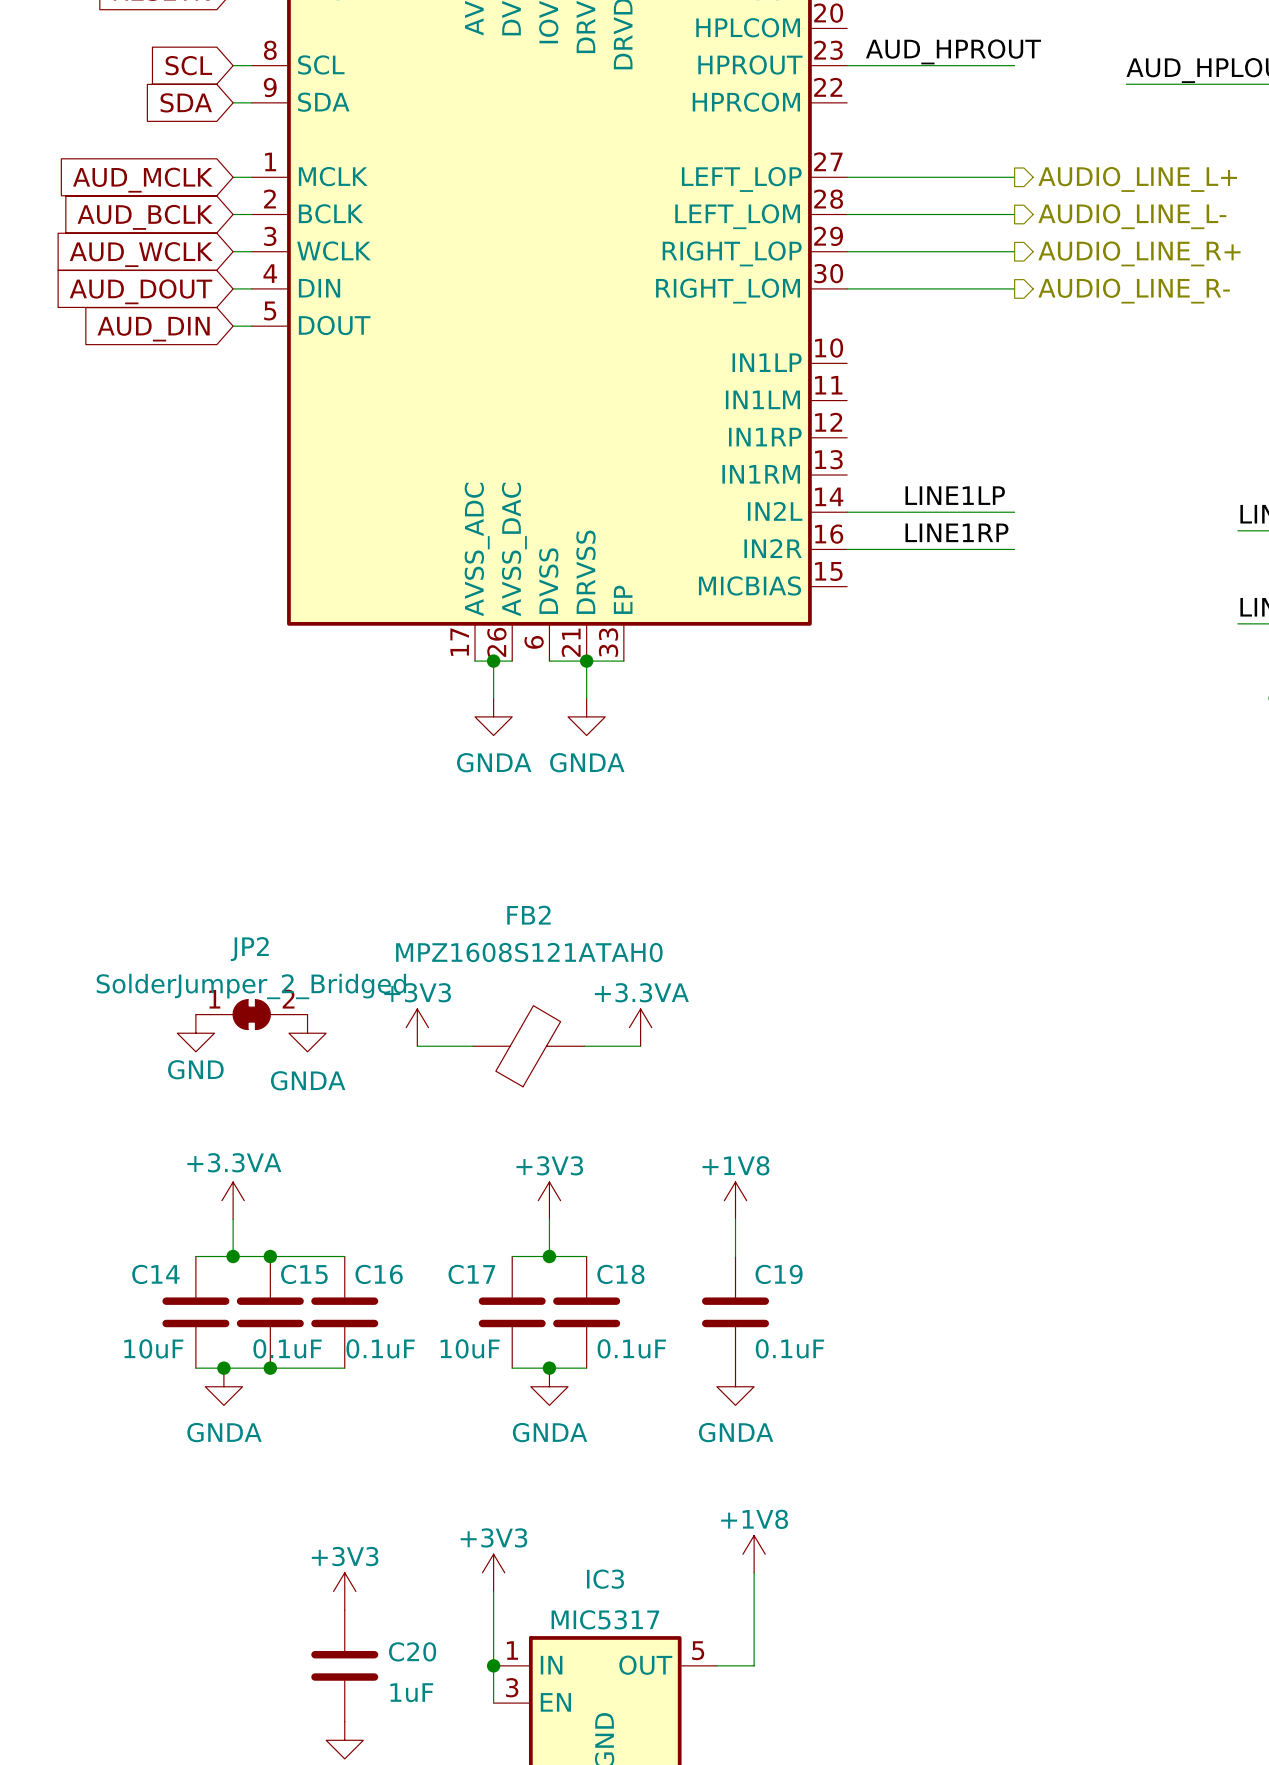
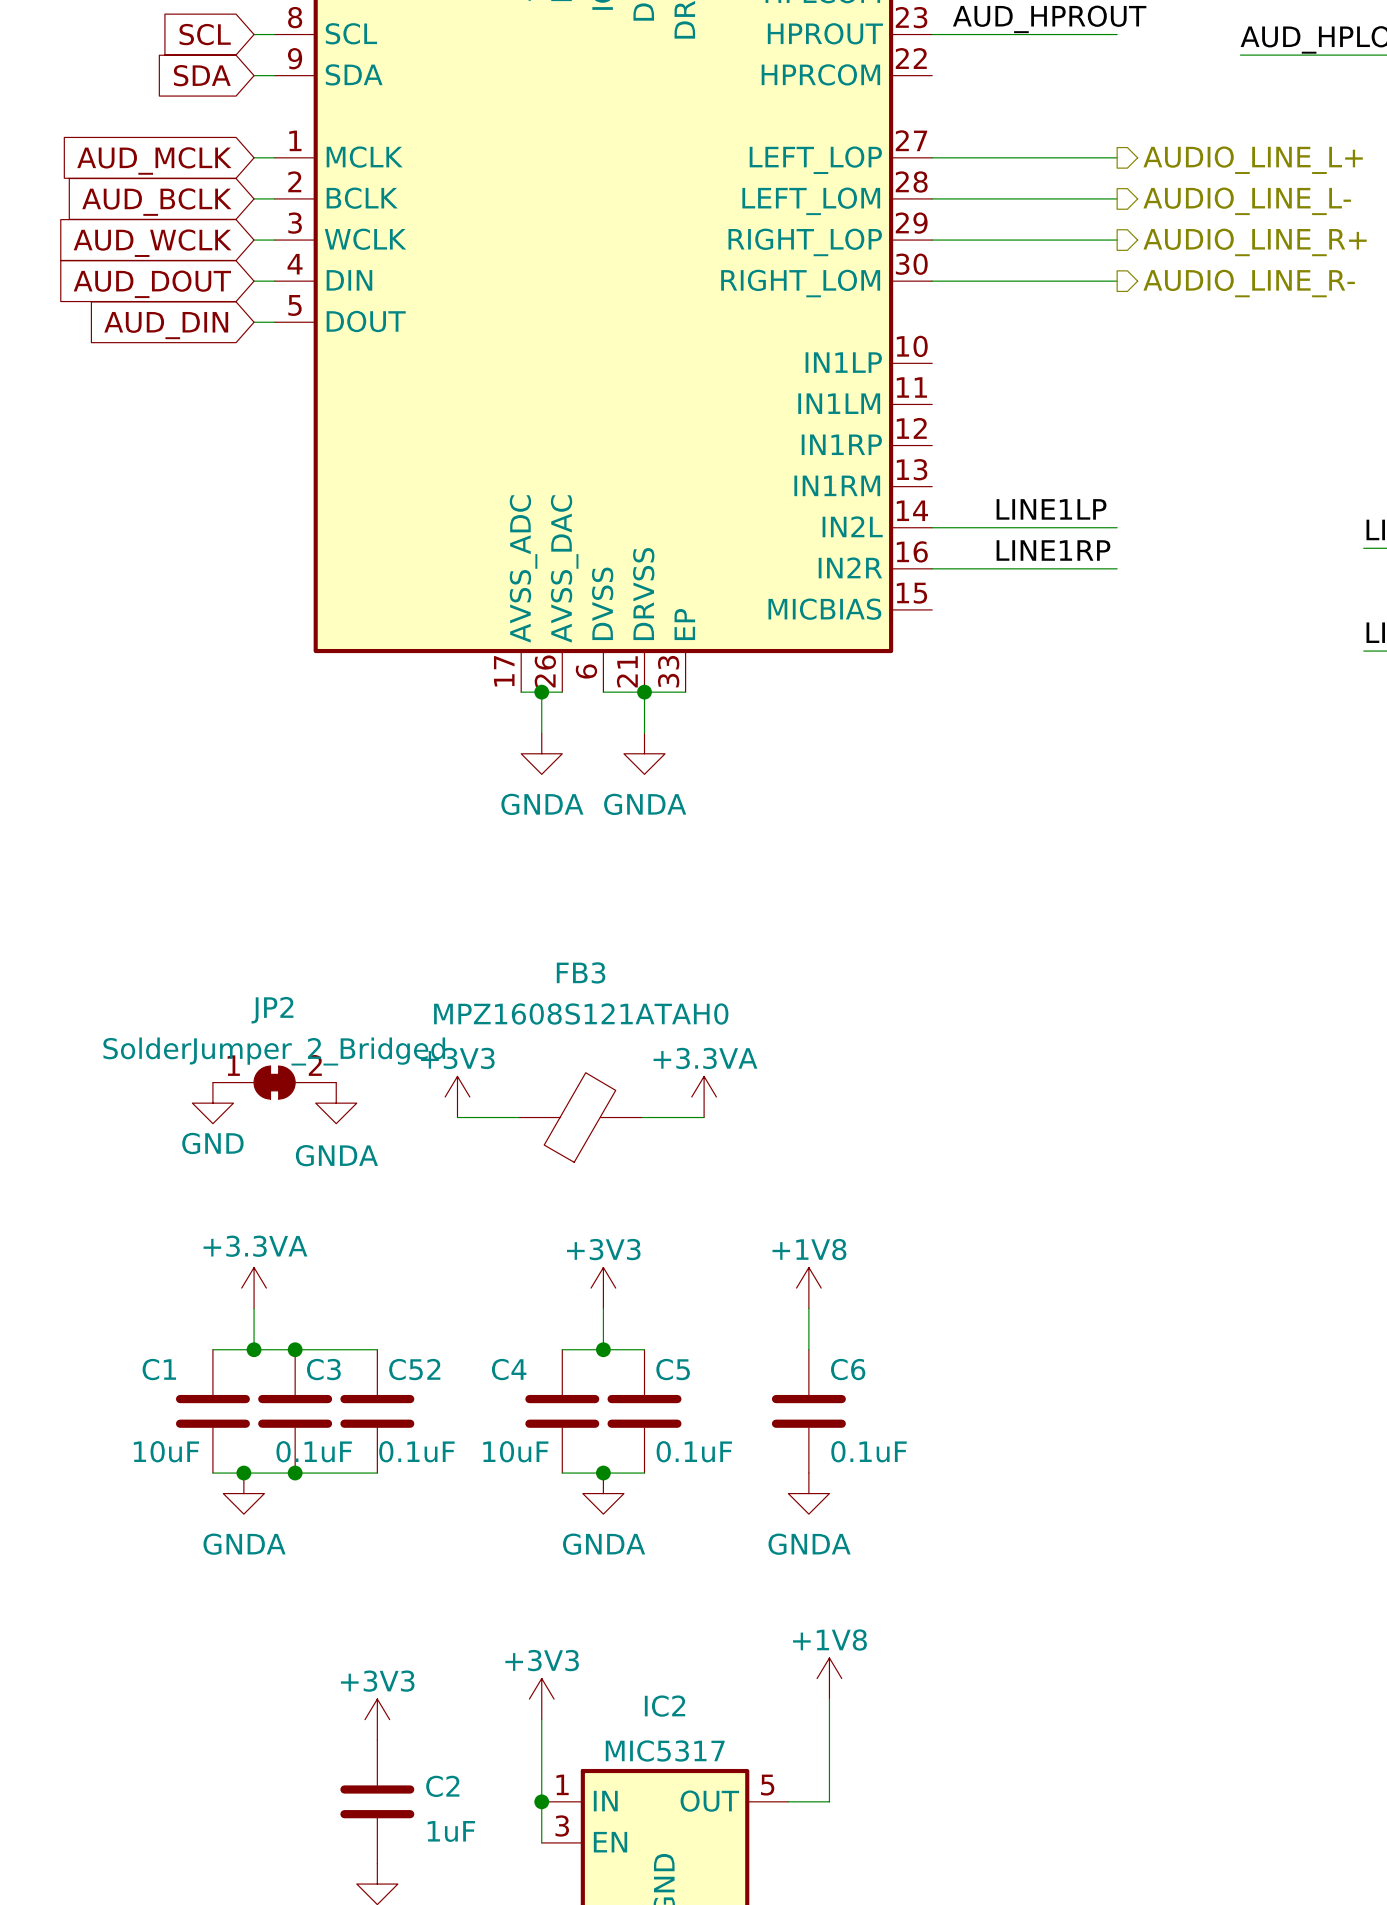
FB2 name: FB2 (528, 915) -> FB3 (581, 972)
C14 name: C14 (155, 1274) -> C1 (159, 1369)
C15 name: C15 (304, 1274) -> C3 (323, 1369)
C16 name: C16 (379, 1274) -> C52 (414, 1369)
C17 name: C17 (471, 1274) -> C4 (509, 1369)
C18 name: C18 (620, 1274) -> C5 (673, 1369)
C19 name: C19 (779, 1274) -> C6 (848, 1369)
IC3 name: IC3 (605, 1579) -> IC2 (665, 1706)
C20 name: C20 (412, 1651) -> C2 (442, 1786)

